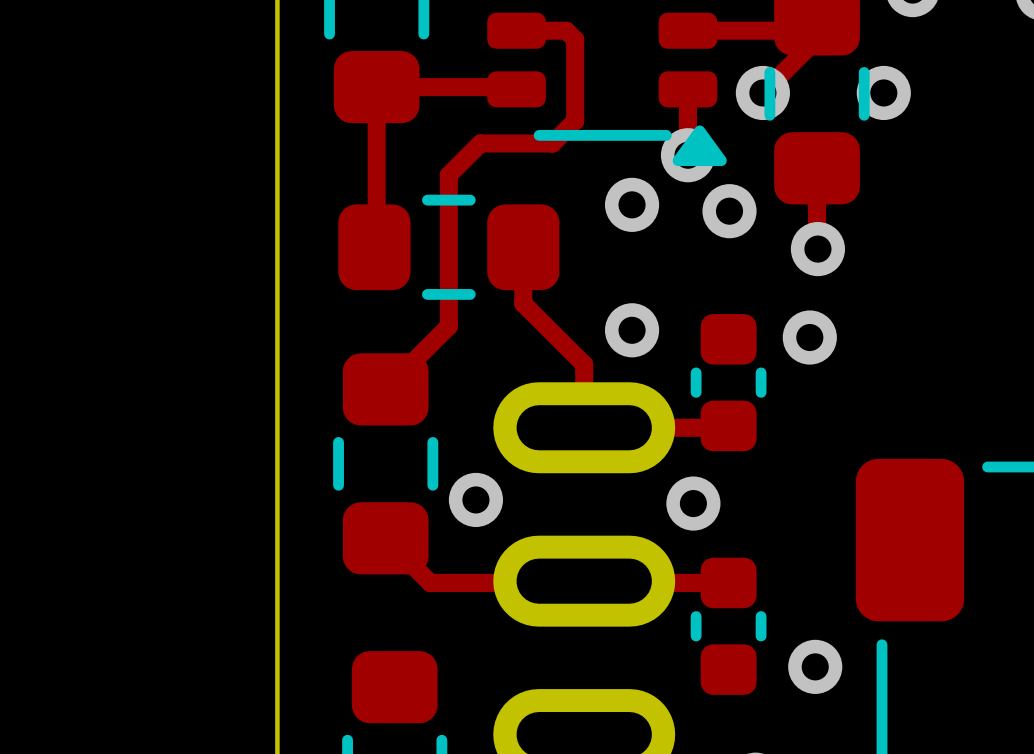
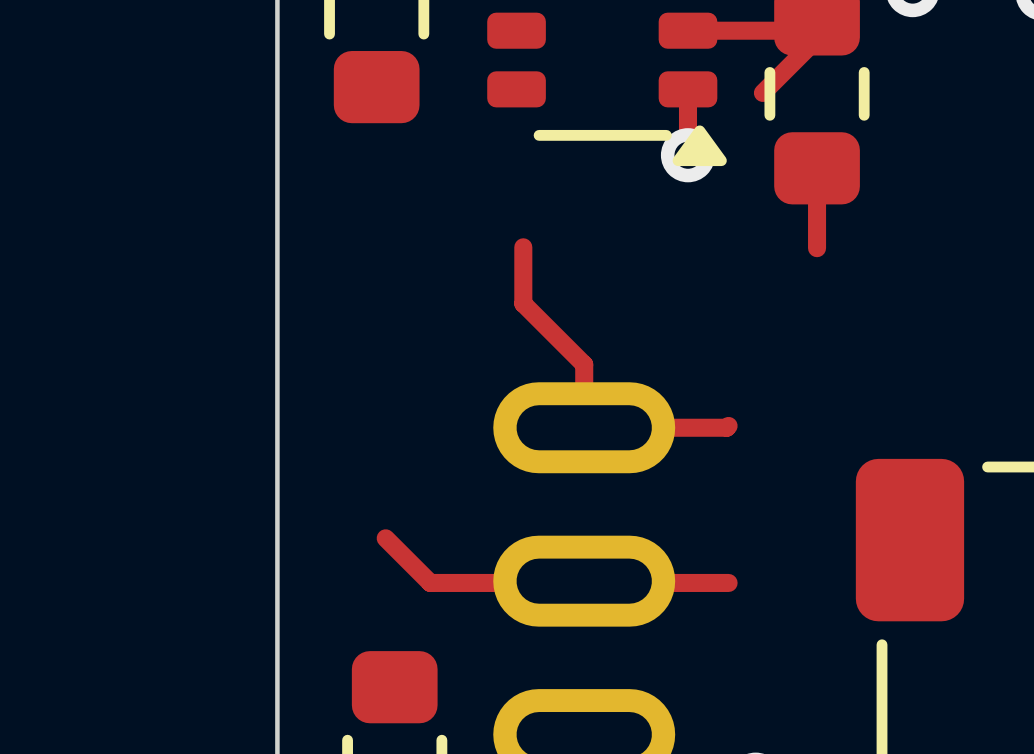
track: (516, 30) (566, 30) (575, 39) (575, 120) (552, 143) (480, 143) (448, 175) (448, 326) (385, 389) -> none
track: (516, 89) (514, 87) (376, 87) (376, 245) (374, 247) -> none
via: (762, 92) -> none
via: (883, 92) -> none
via: (632, 204) -> none
via: (729, 211) -> none
part: (448, 247) -> none
via: (817, 249) -> none
via: (632, 330) -> none
via: (809, 337) -> none
part: (728, 382) -> none
part: (385, 463) -> none
via: (475, 499) -> none
via: (693, 503) -> none
part: (728, 626) -> none
via: (815, 666) -> none

